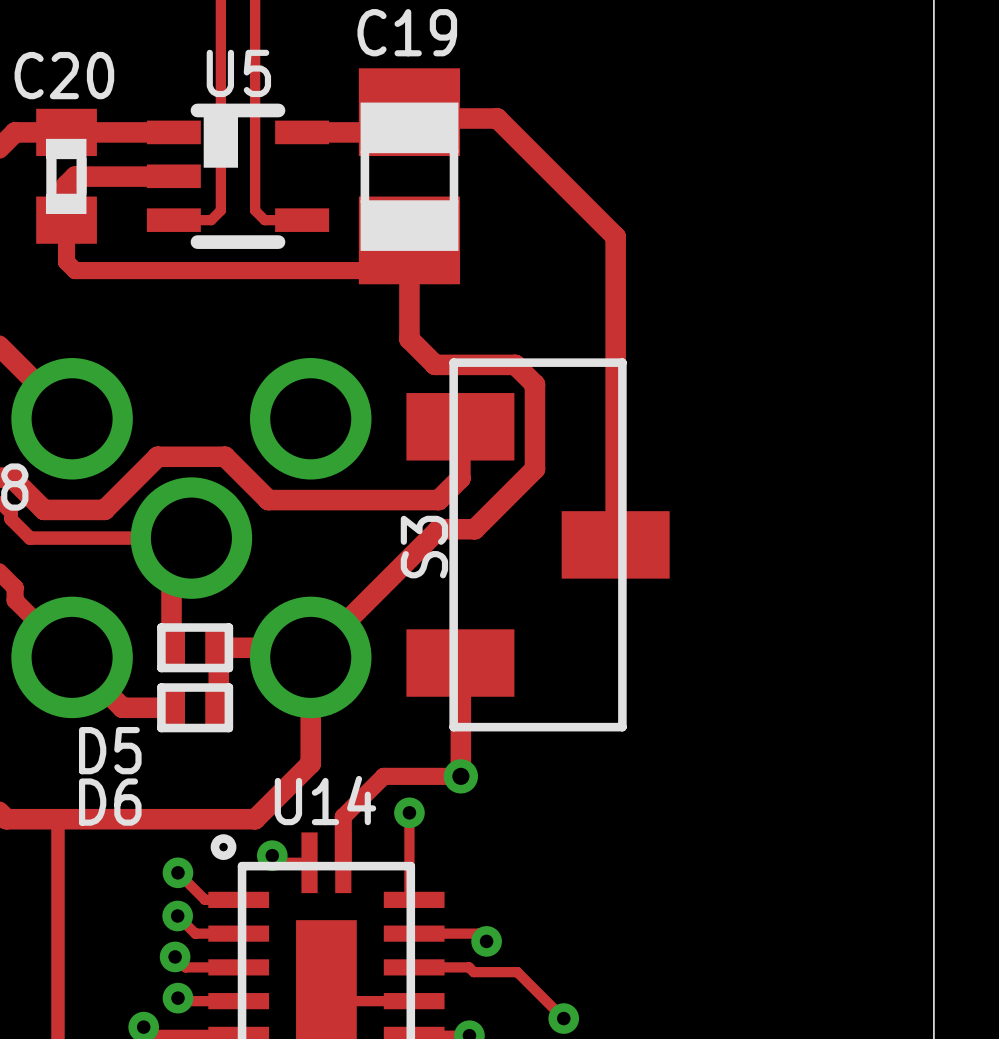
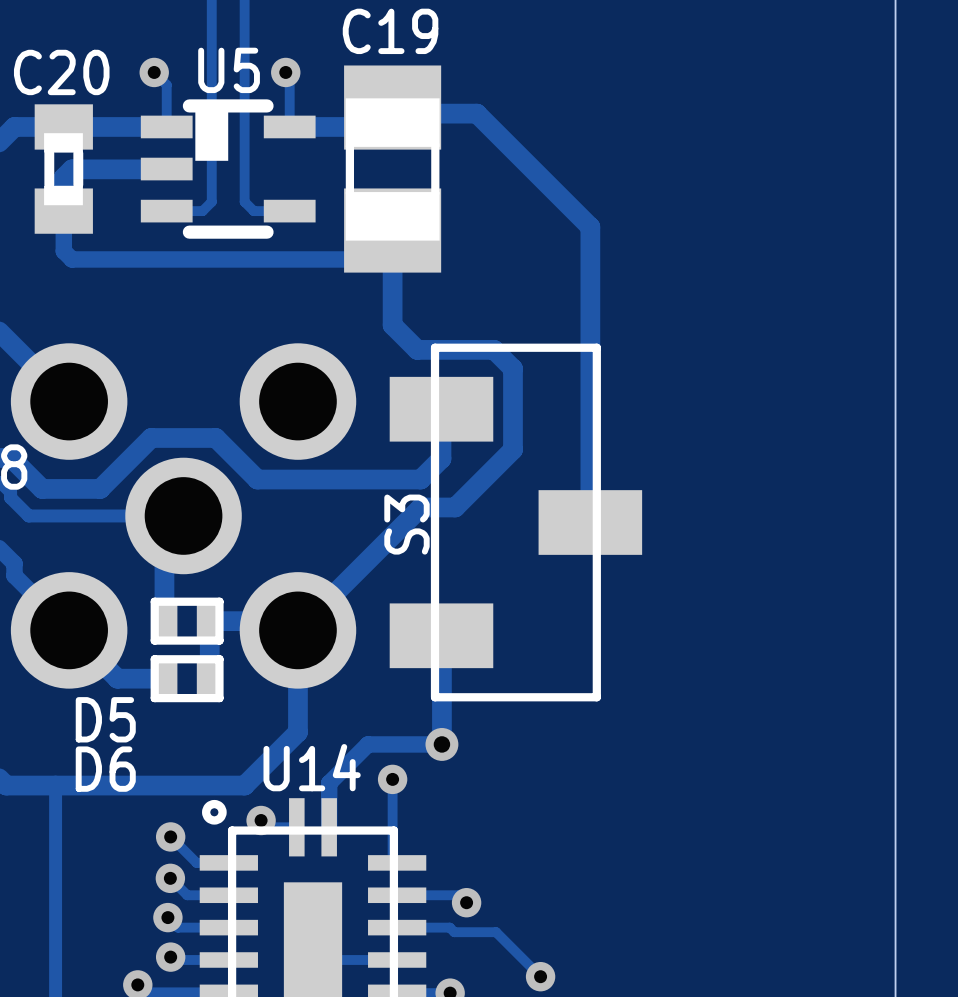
track: none -> (154, 72) (166, 84) (166, 126)
via: none -> (154, 72)
track: none -> (285, 72) (289, 76) (289, 126)
via: none -> (285, 72)

